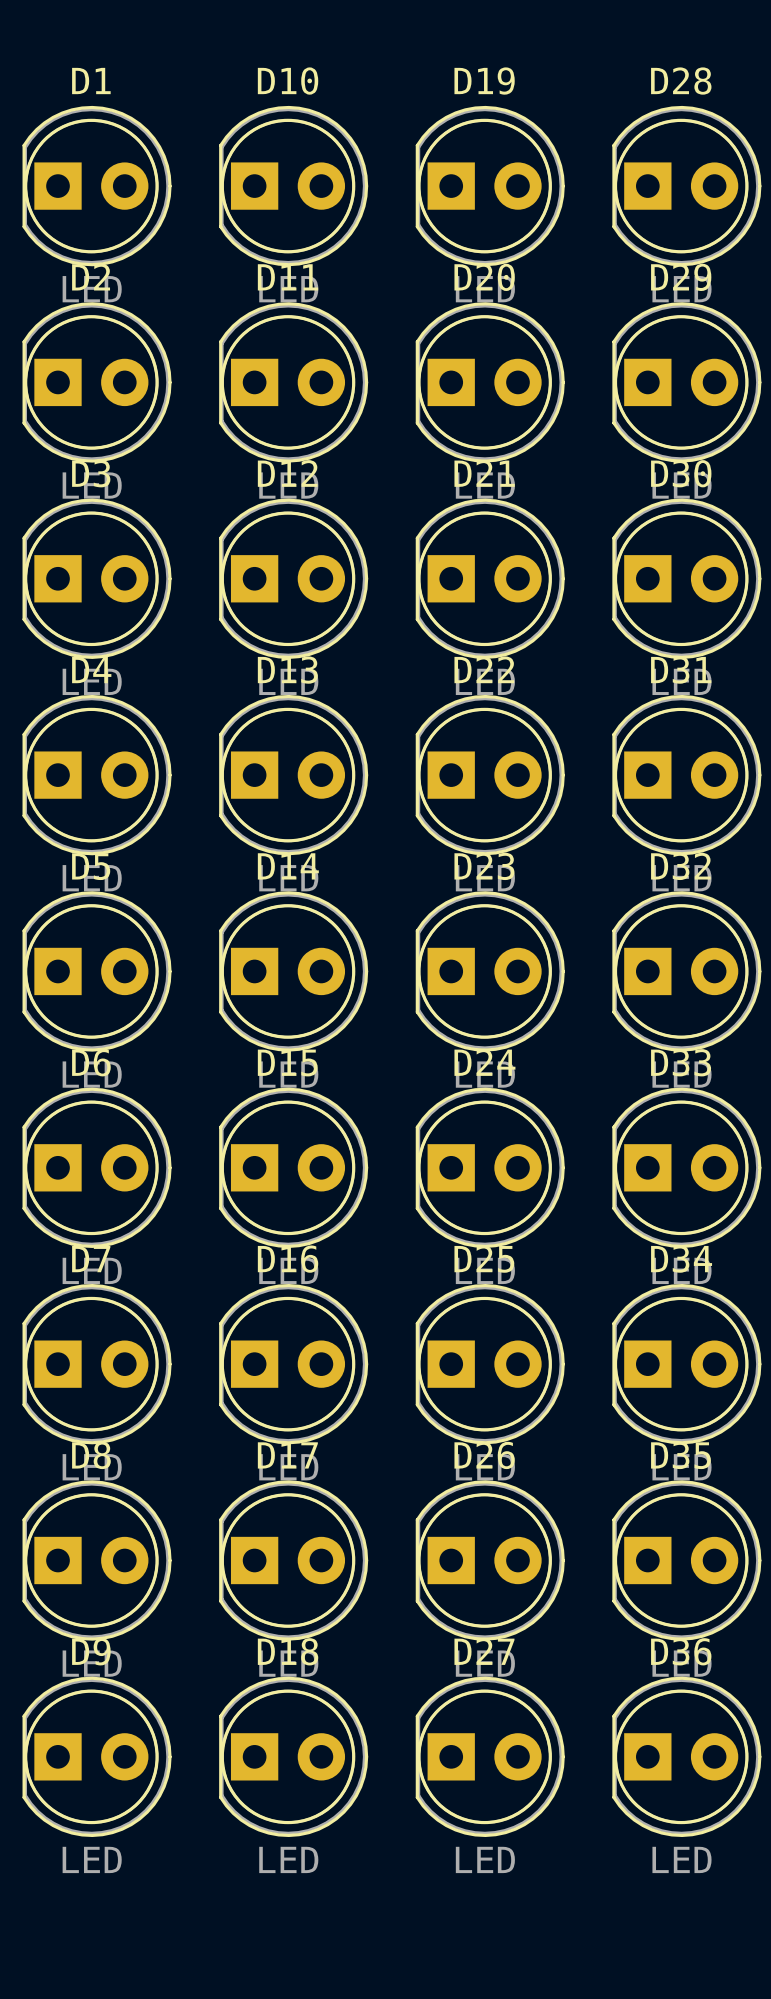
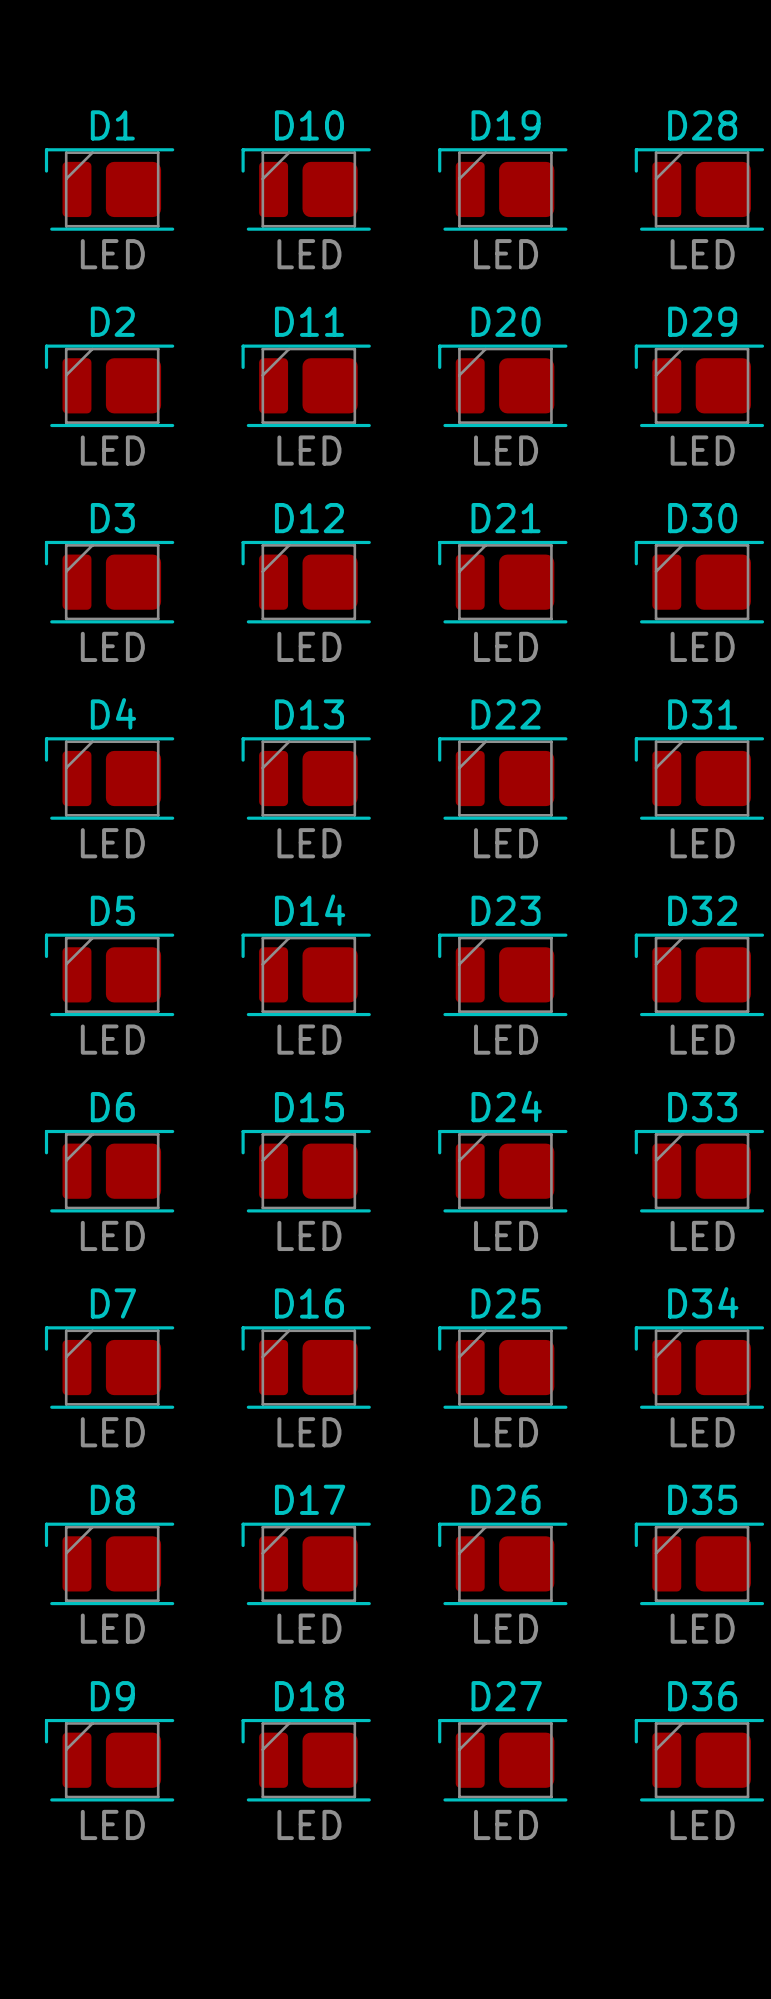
D1 footprint: [22, 105, 172, 267] -> [44, 148, 175, 231]
D10 footprint: [219, 105, 369, 267] -> [241, 148, 371, 231]
D19 footprint: [415, 105, 565, 267] -> [438, 148, 568, 231]
D28 footprint: [612, 105, 762, 267] -> [634, 148, 765, 231]
D2 footprint: [22, 302, 172, 463] -> [44, 344, 175, 428]
D11 footprint: [219, 302, 369, 463] -> [241, 344, 371, 428]
D20 footprint: [415, 302, 565, 463] -> [438, 344, 568, 428]
D29 footprint: [612, 302, 762, 463] -> [634, 344, 765, 428]
D3 footprint: [22, 498, 172, 659] -> [44, 540, 175, 624]
D12 footprint: [219, 498, 369, 659] -> [241, 540, 371, 624]
D21 footprint: [415, 498, 565, 659] -> [438, 540, 568, 624]
D30 footprint: [612, 498, 762, 659] -> [634, 540, 765, 624]
D4 footprint: [22, 694, 172, 856] -> [44, 737, 175, 820]
D13 footprint: [219, 694, 369, 856] -> [241, 737, 371, 820]
D22 footprint: [415, 694, 565, 856] -> [438, 737, 568, 820]
D31 footprint: [612, 694, 762, 856] -> [634, 737, 765, 820]
D5 footprint: [22, 891, 172, 1052] -> [44, 933, 175, 1017]
D14 footprint: [219, 891, 369, 1052] -> [241, 933, 371, 1017]
D23 footprint: [415, 891, 565, 1052] -> [438, 933, 568, 1017]
D32 footprint: [612, 891, 762, 1052] -> [634, 933, 765, 1017]
D6 footprint: [22, 1087, 172, 1248] -> [44, 1129, 175, 1213]
D15 footprint: [219, 1087, 369, 1248] -> [241, 1129, 371, 1213]
D24 footprint: [415, 1087, 565, 1248] -> [438, 1129, 568, 1213]
D33 footprint: [612, 1087, 762, 1248] -> [634, 1129, 765, 1213]
D7 footprint: [22, 1283, 172, 1445] -> [44, 1326, 175, 1409]
D16 footprint: [219, 1283, 369, 1445] -> [241, 1326, 371, 1409]
D25 footprint: [415, 1283, 565, 1445] -> [438, 1326, 568, 1409]
D34 footprint: [612, 1283, 762, 1445] -> [634, 1326, 765, 1409]
D8 footprint: [22, 1480, 172, 1641] -> [44, 1522, 175, 1606]
D17 footprint: [219, 1480, 369, 1641] -> [241, 1522, 371, 1606]
D26 footprint: [415, 1480, 565, 1641] -> [438, 1522, 568, 1606]
D35 footprint: [612, 1480, 762, 1641] -> [634, 1522, 765, 1606]
D9 footprint: [22, 1676, 172, 1838] -> [44, 1718, 175, 1802]
D18 footprint: [219, 1676, 369, 1838] -> [241, 1718, 371, 1802]
D27 footprint: [415, 1676, 565, 1838] -> [438, 1718, 568, 1802]
D36 footprint: [612, 1676, 762, 1838] -> [634, 1718, 765, 1802]

